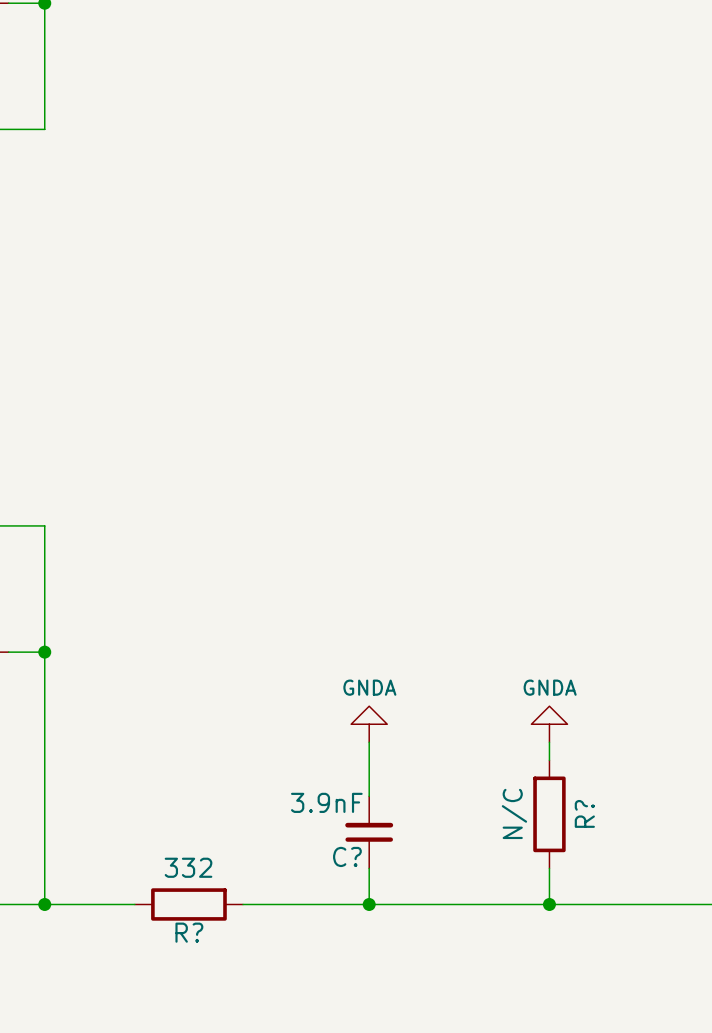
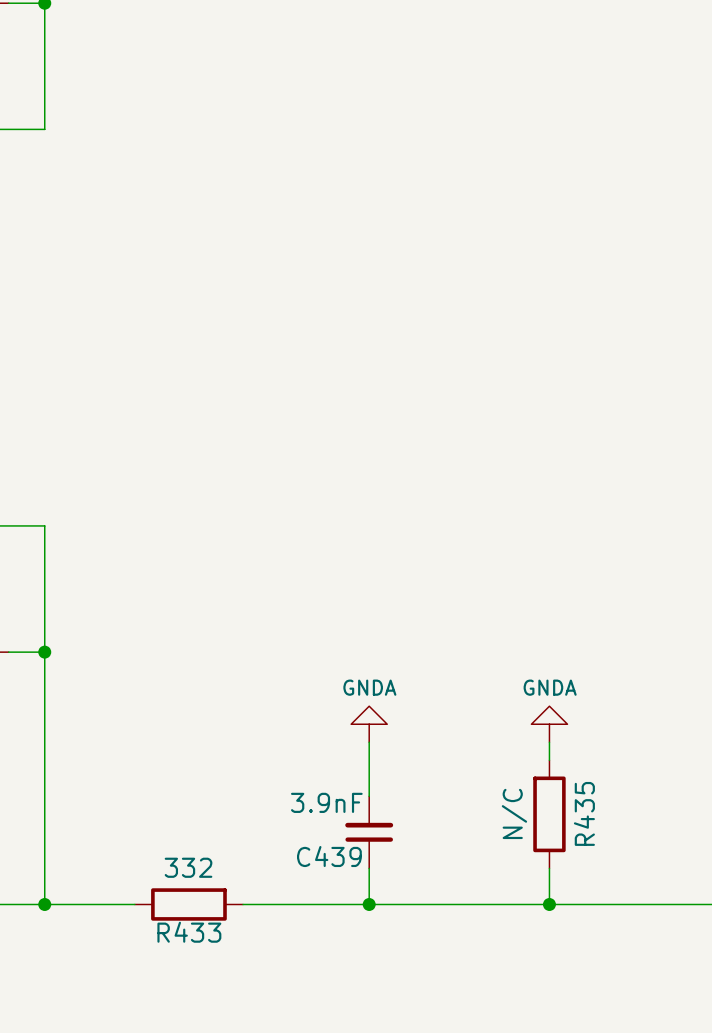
R? name: R? (584, 813) -> R435 (584, 813)
C? name: C? (347, 856) -> C439 (329, 856)
R? name: R? (189, 932) -> R433 (189, 932)

